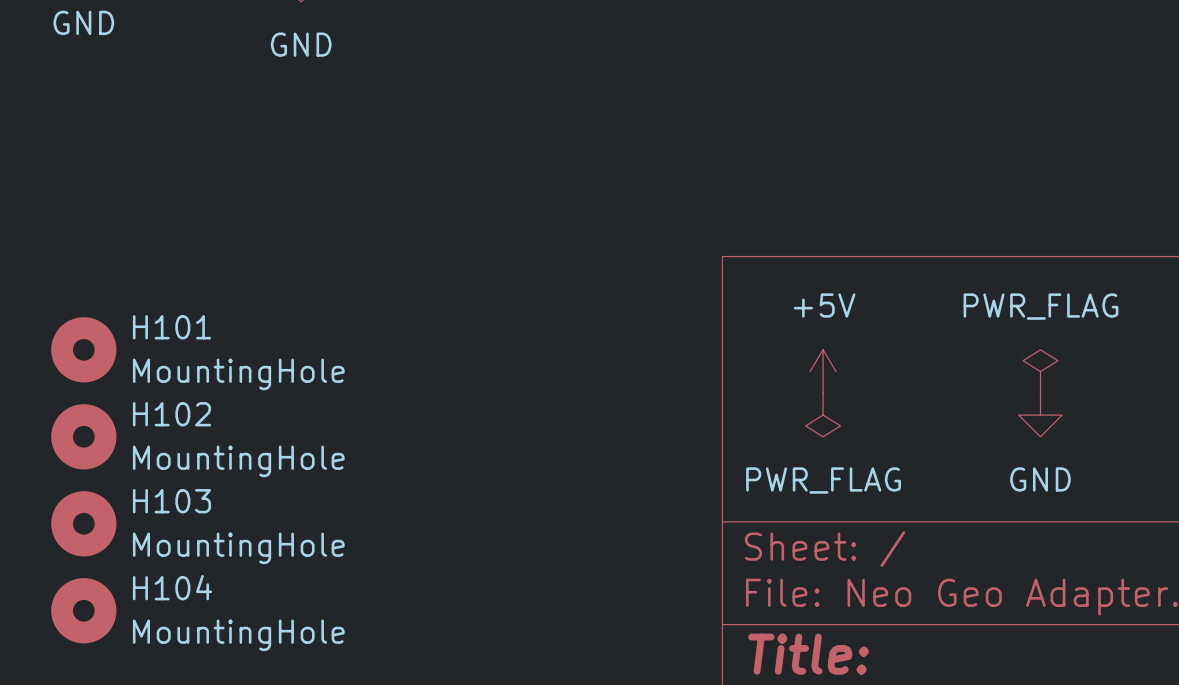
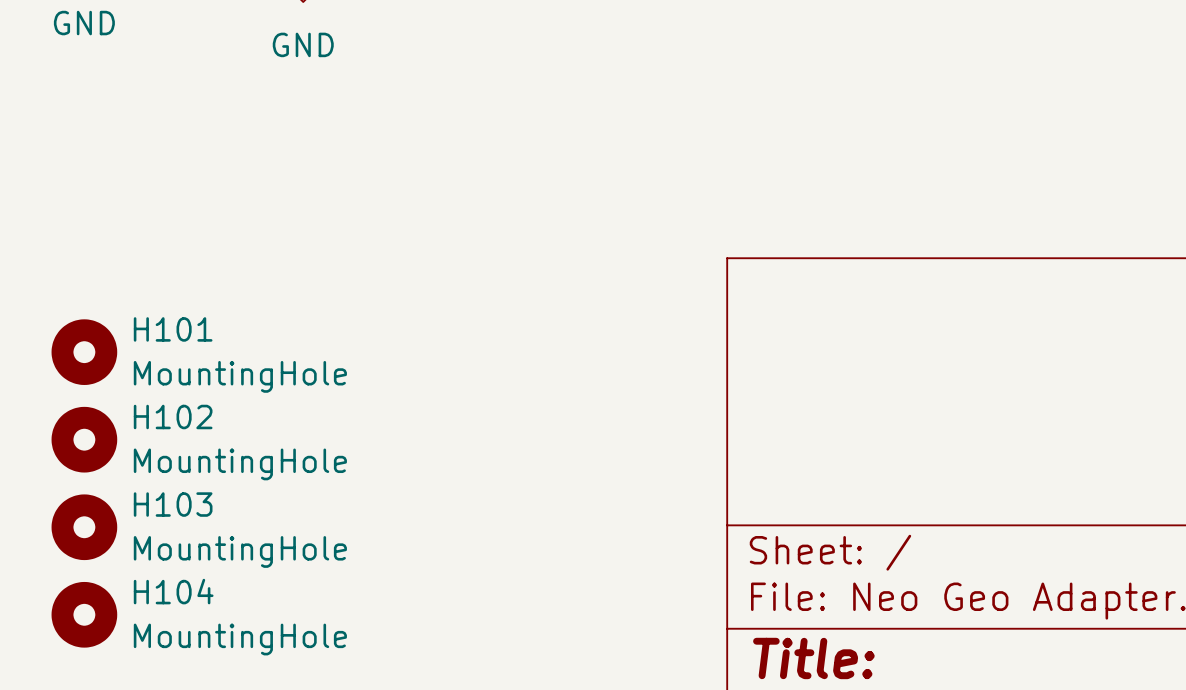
power symbol: +5V (823, 371) -> none
power symbol: PWR_FLAG (1040, 371) -> none
power symbol: PWR_FLAG (823, 415) -> none
power symbol: GND (1040, 415) -> none

